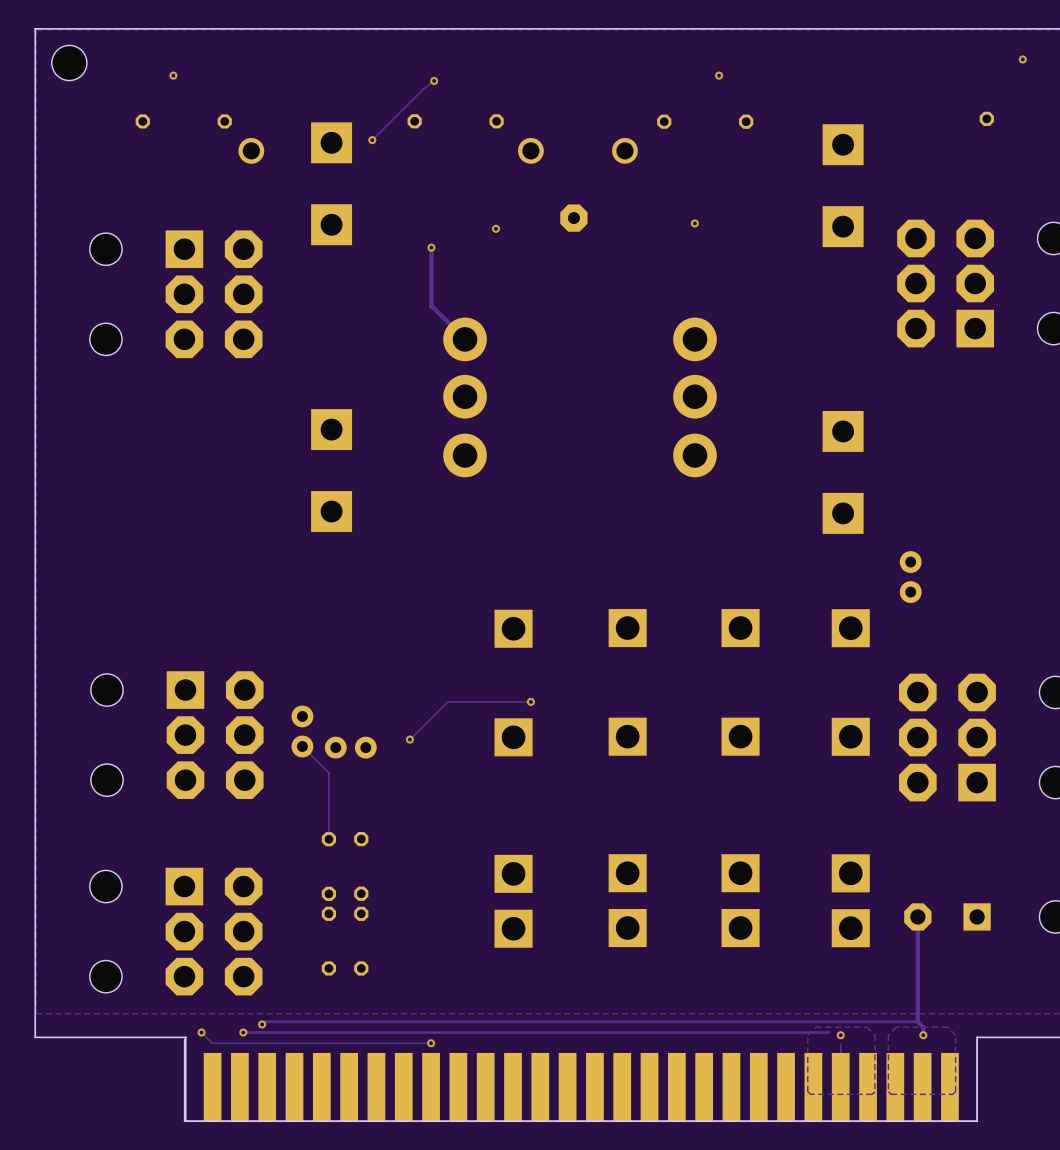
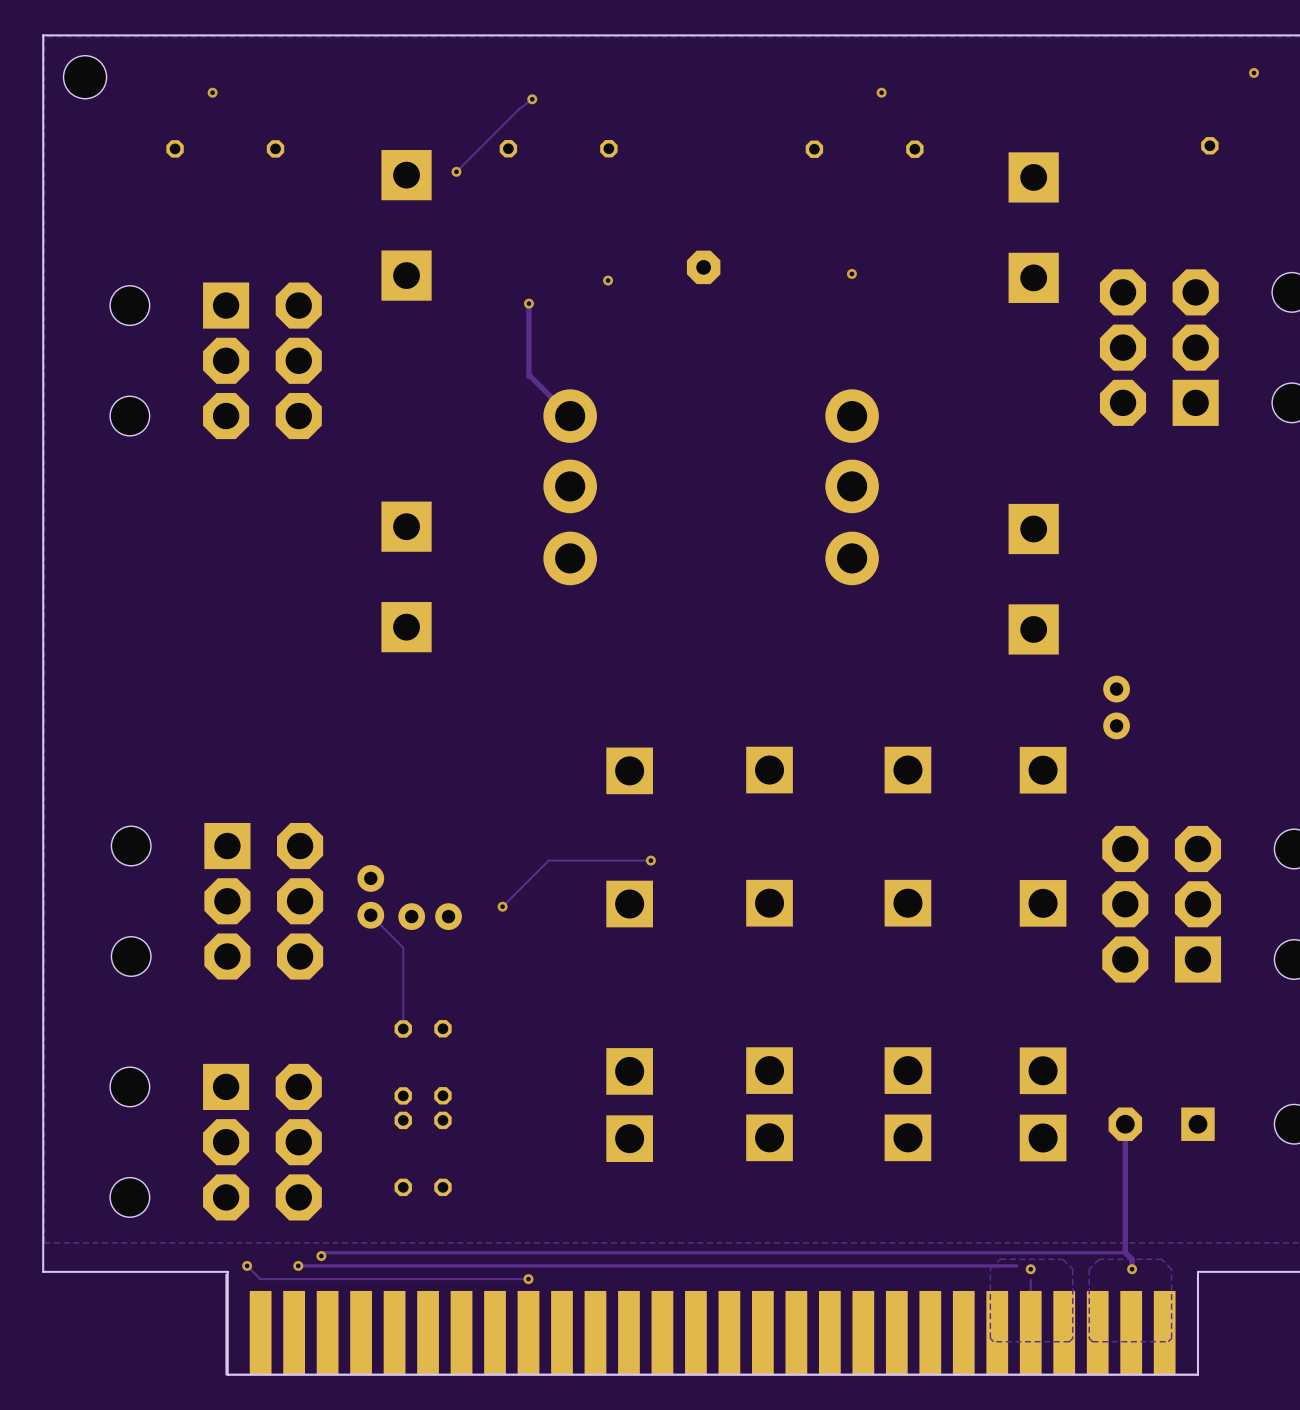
part: (251, 150) -> none
part: (530, 150) -> none
part: (624, 150) -> none

